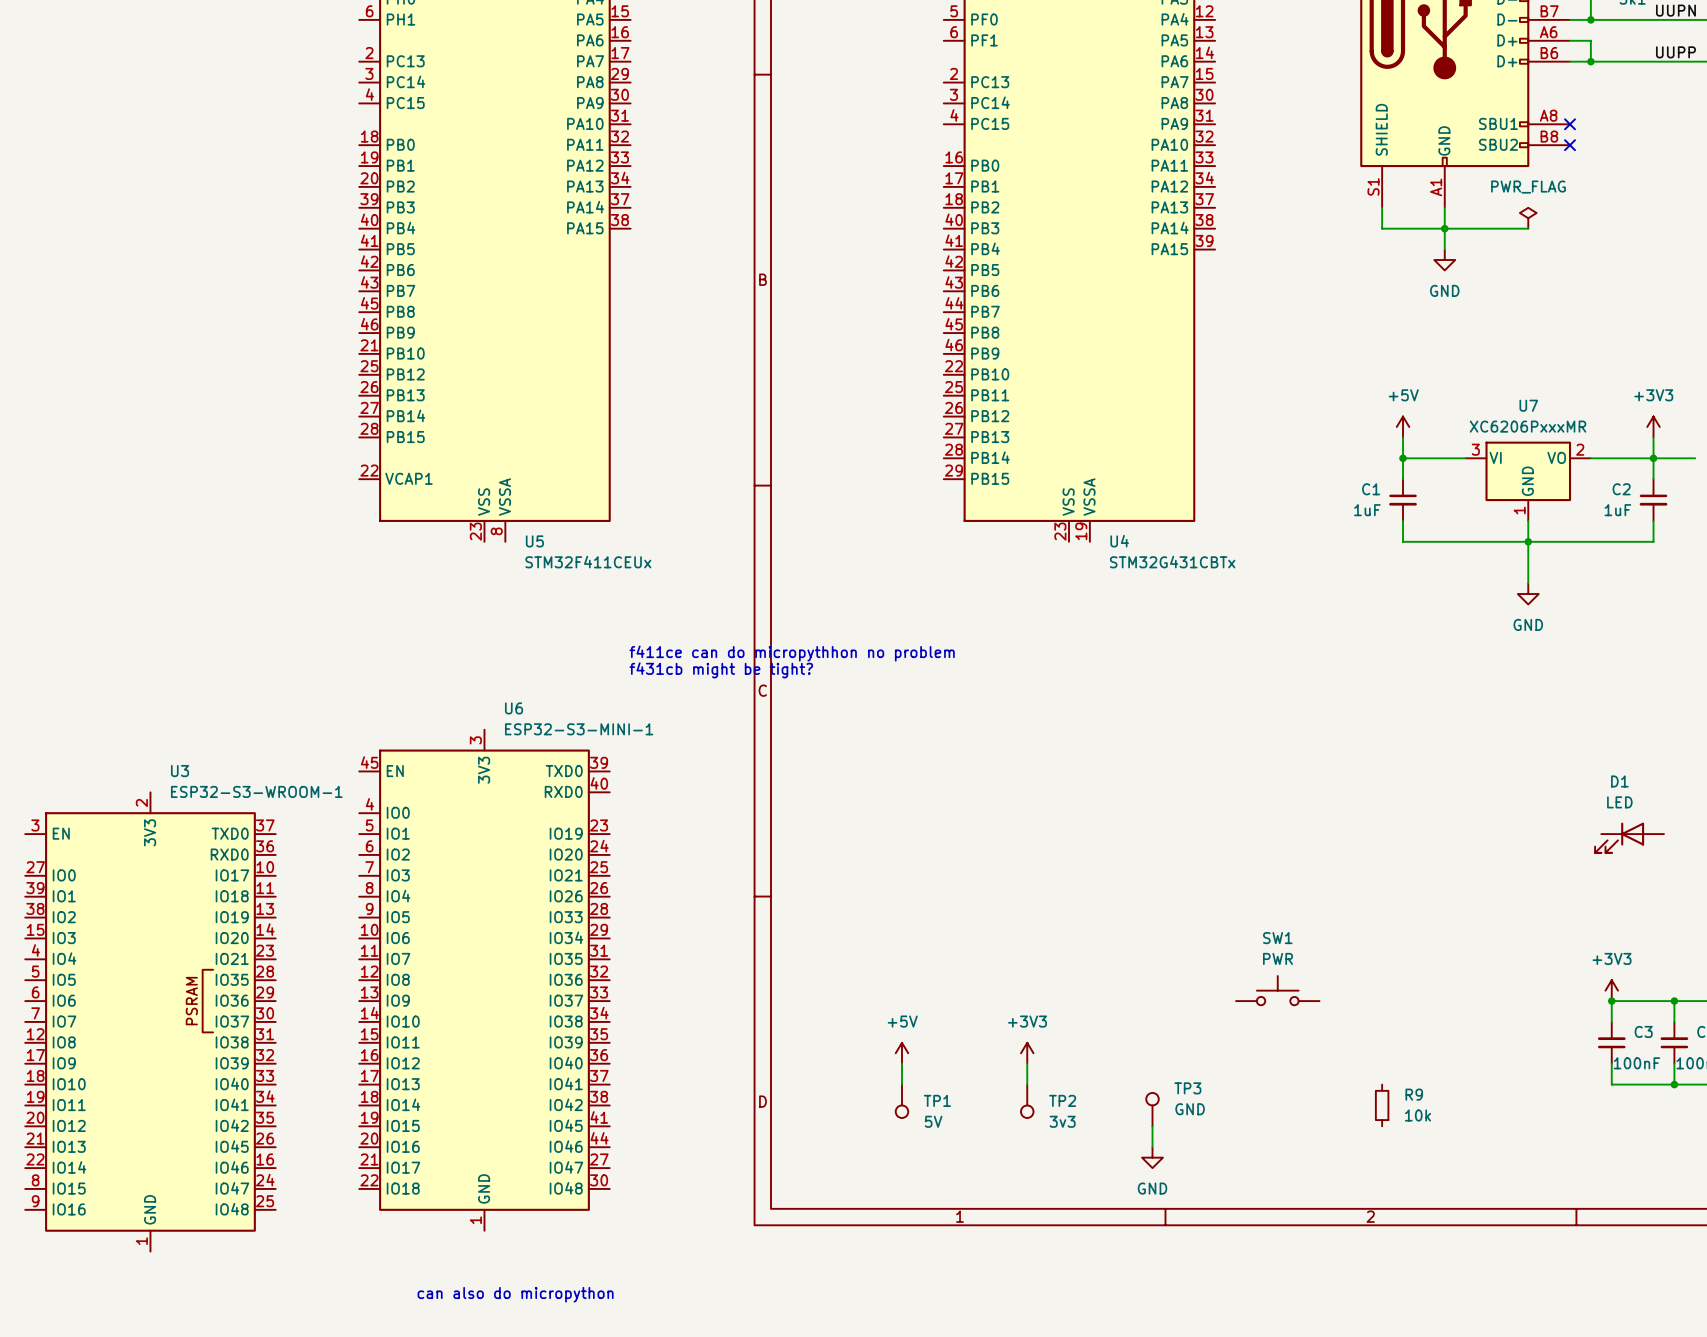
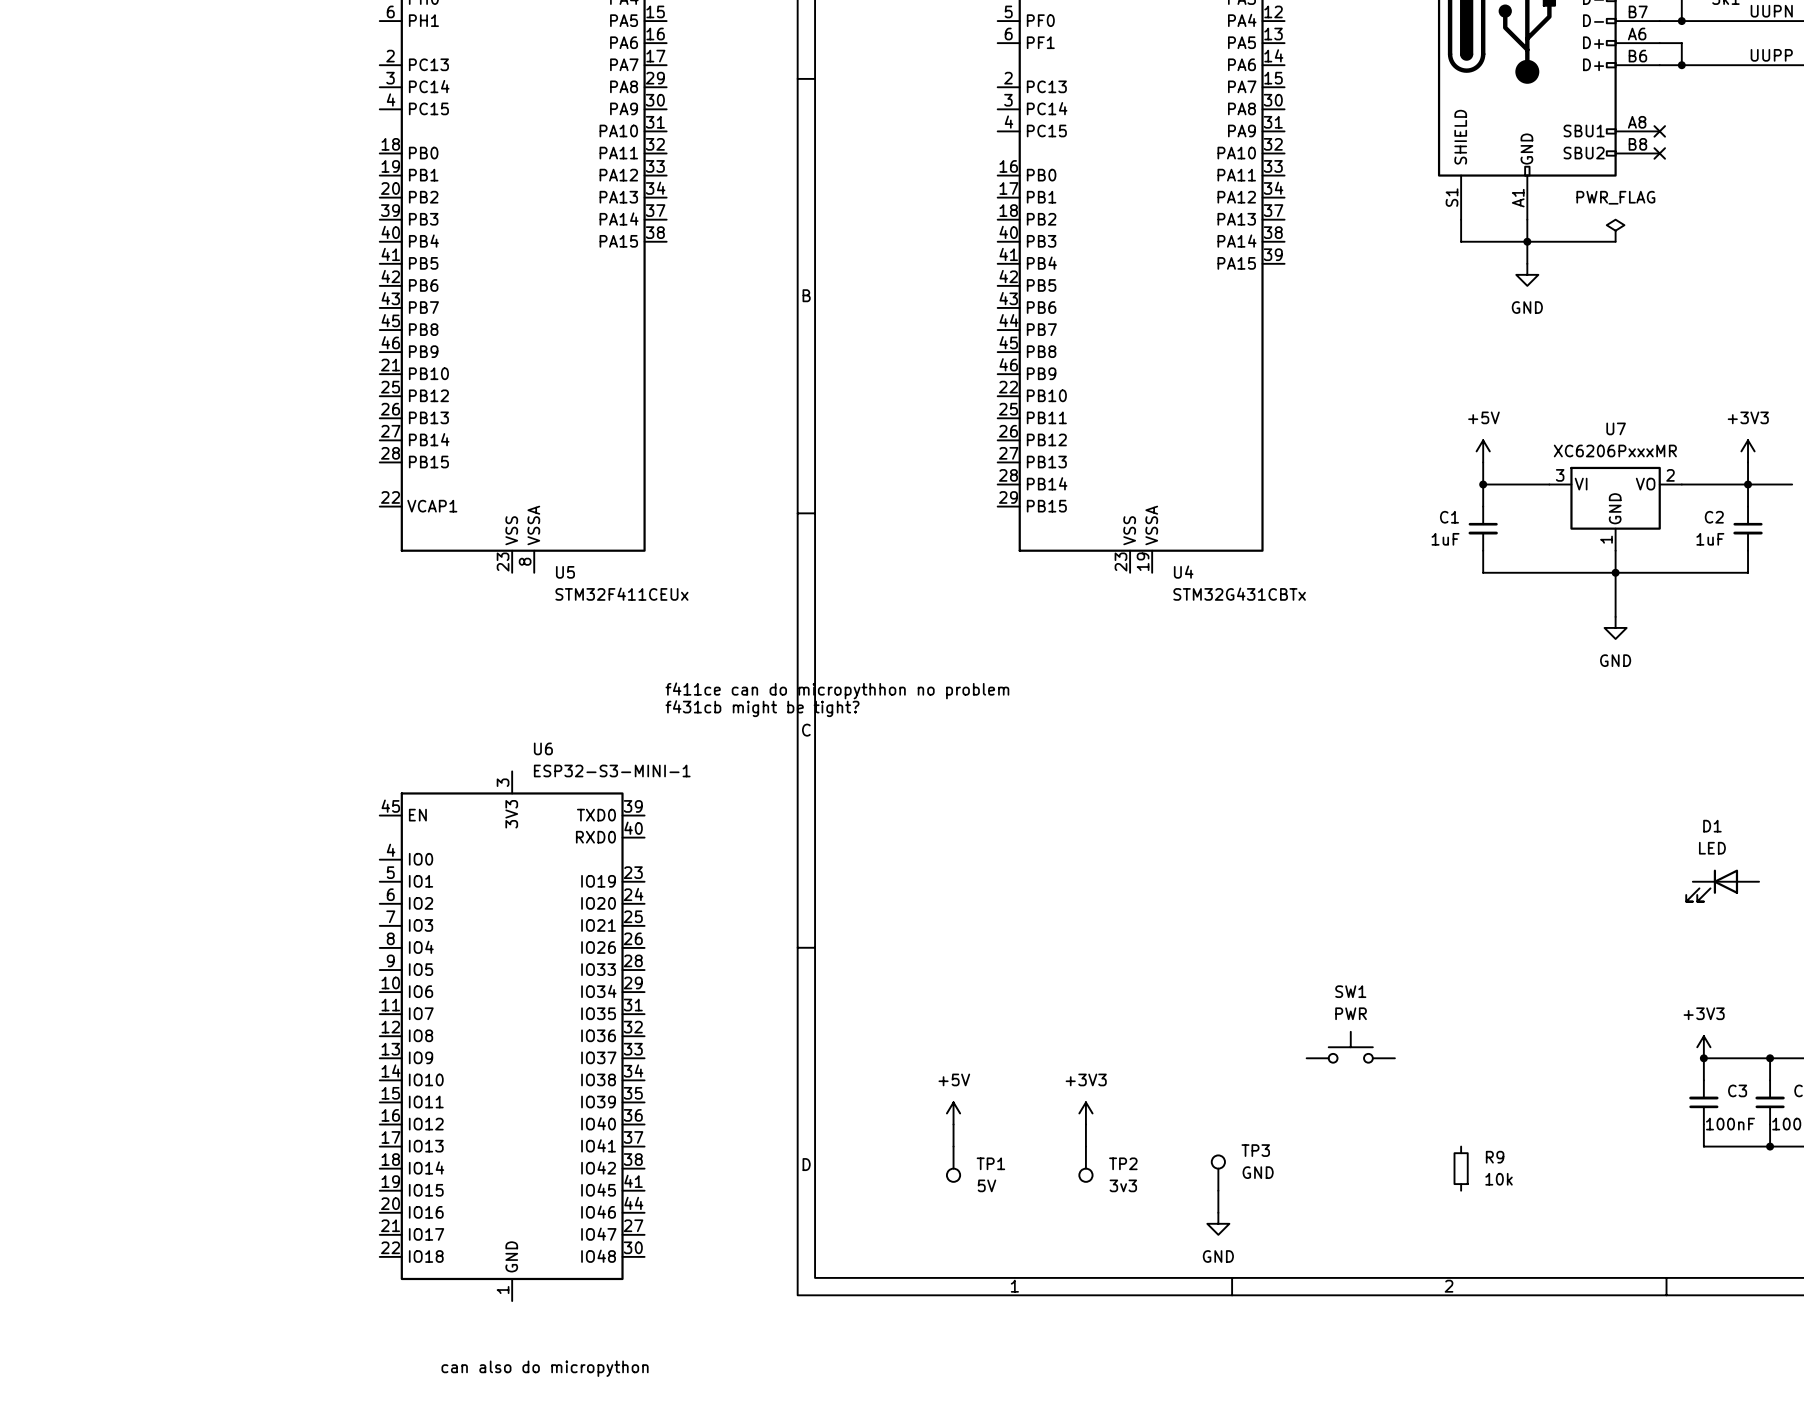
U3: ESP32-S3-WROOM-1 (150, 1021) -> none

